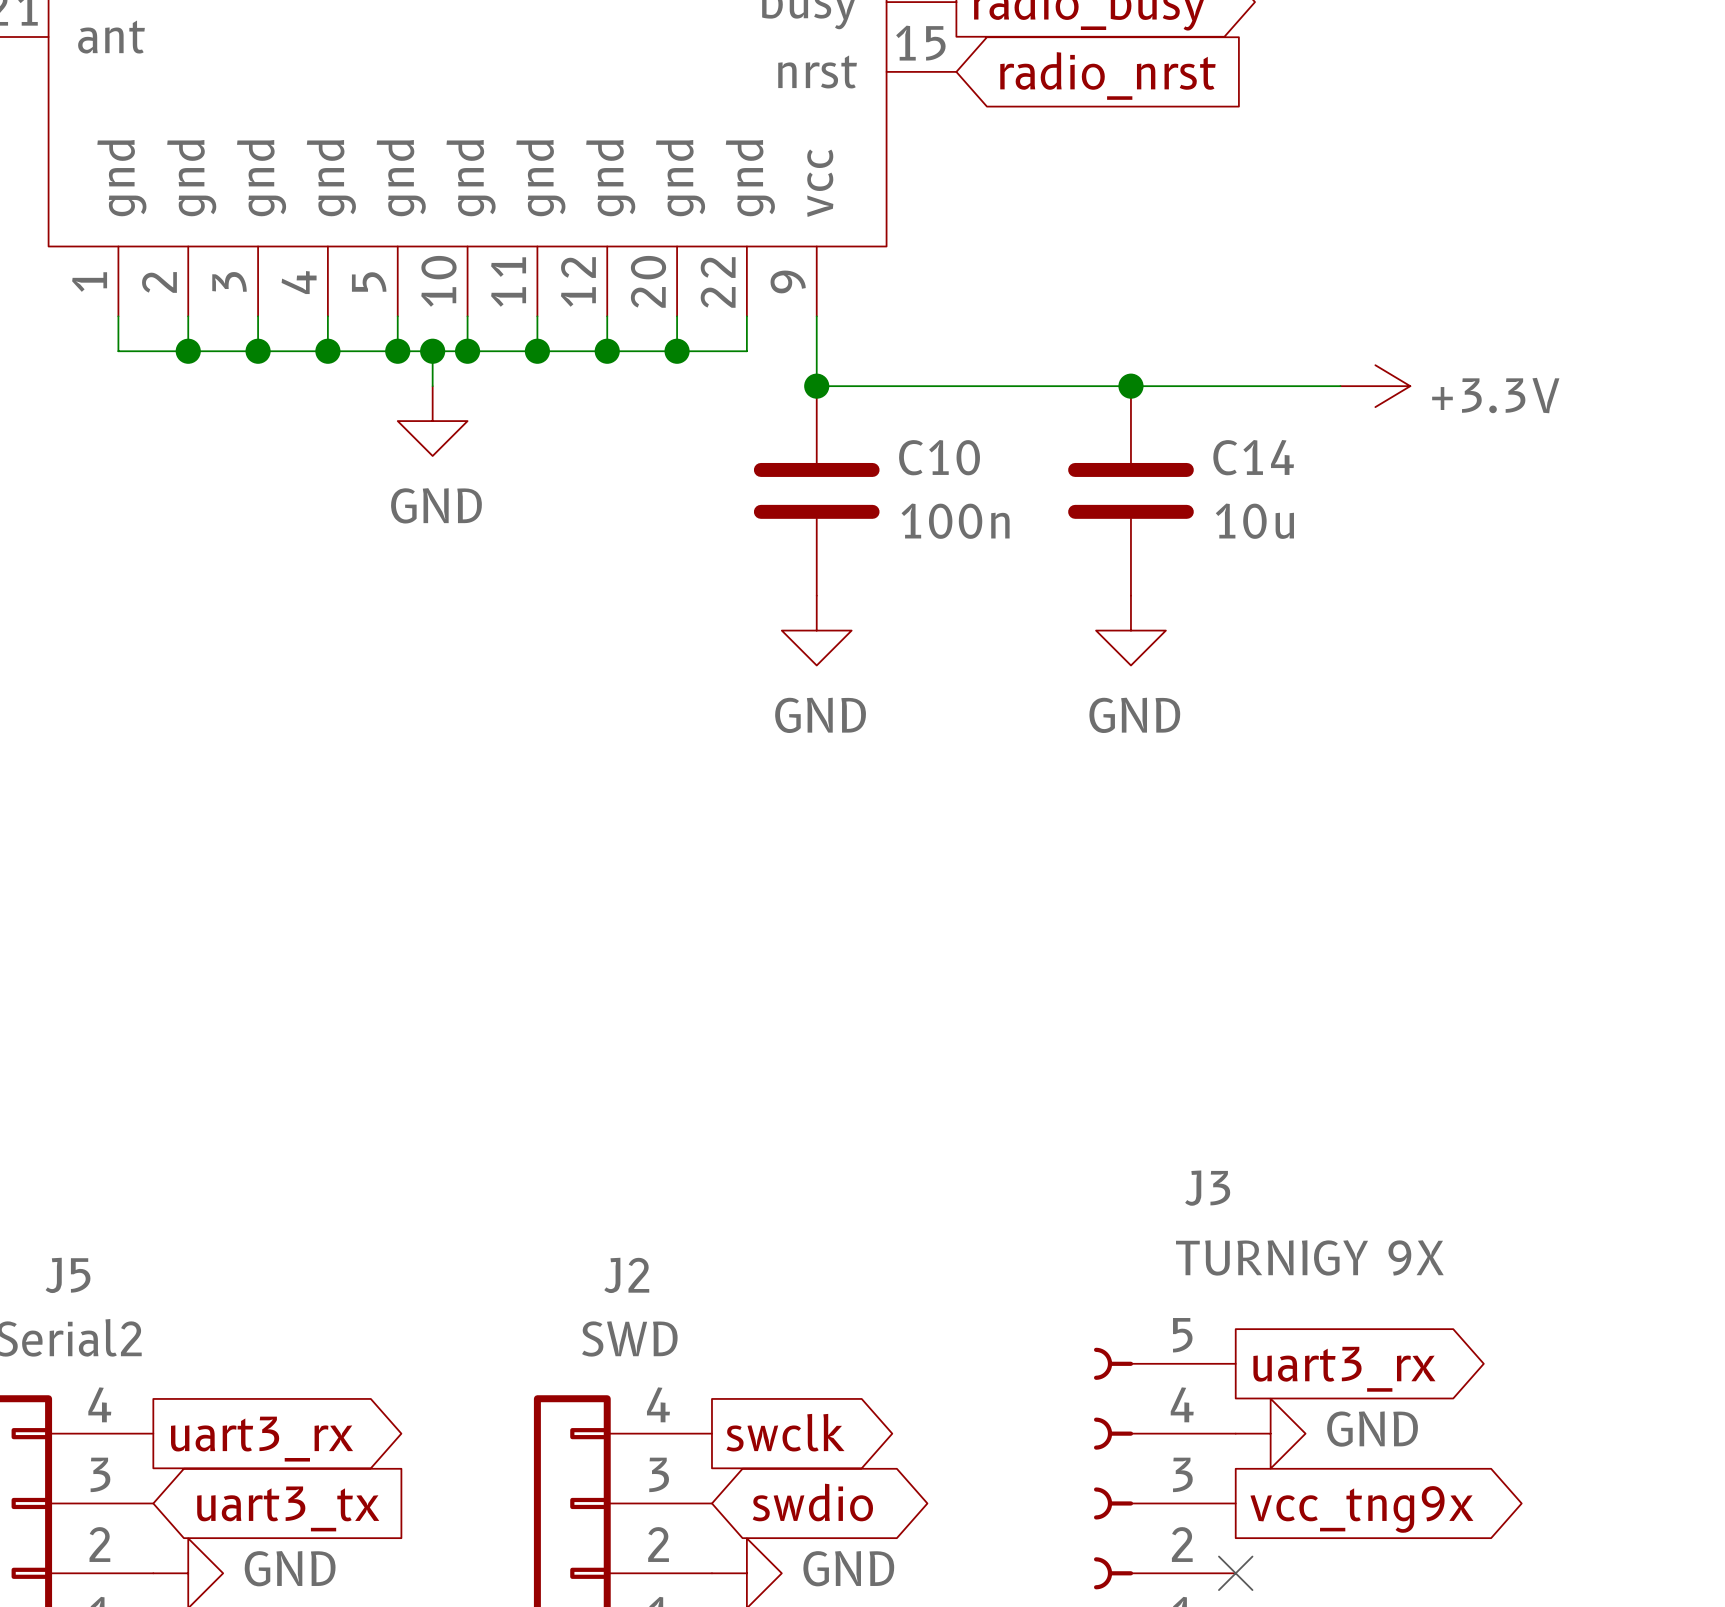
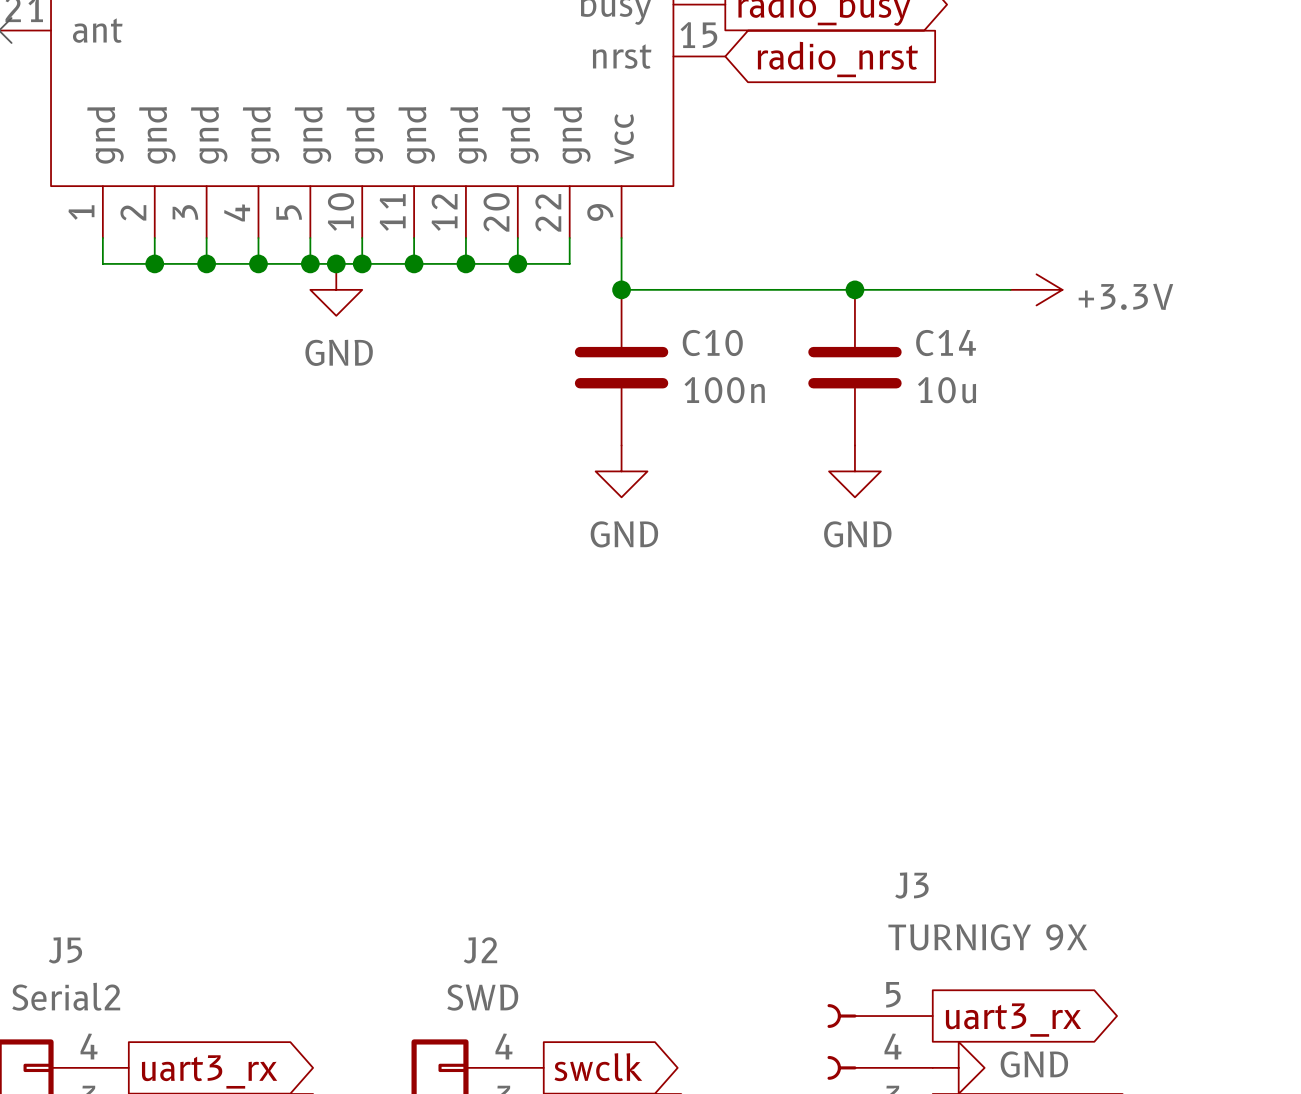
power symbol position: GND (432, 421) -> GND (336, 289)

